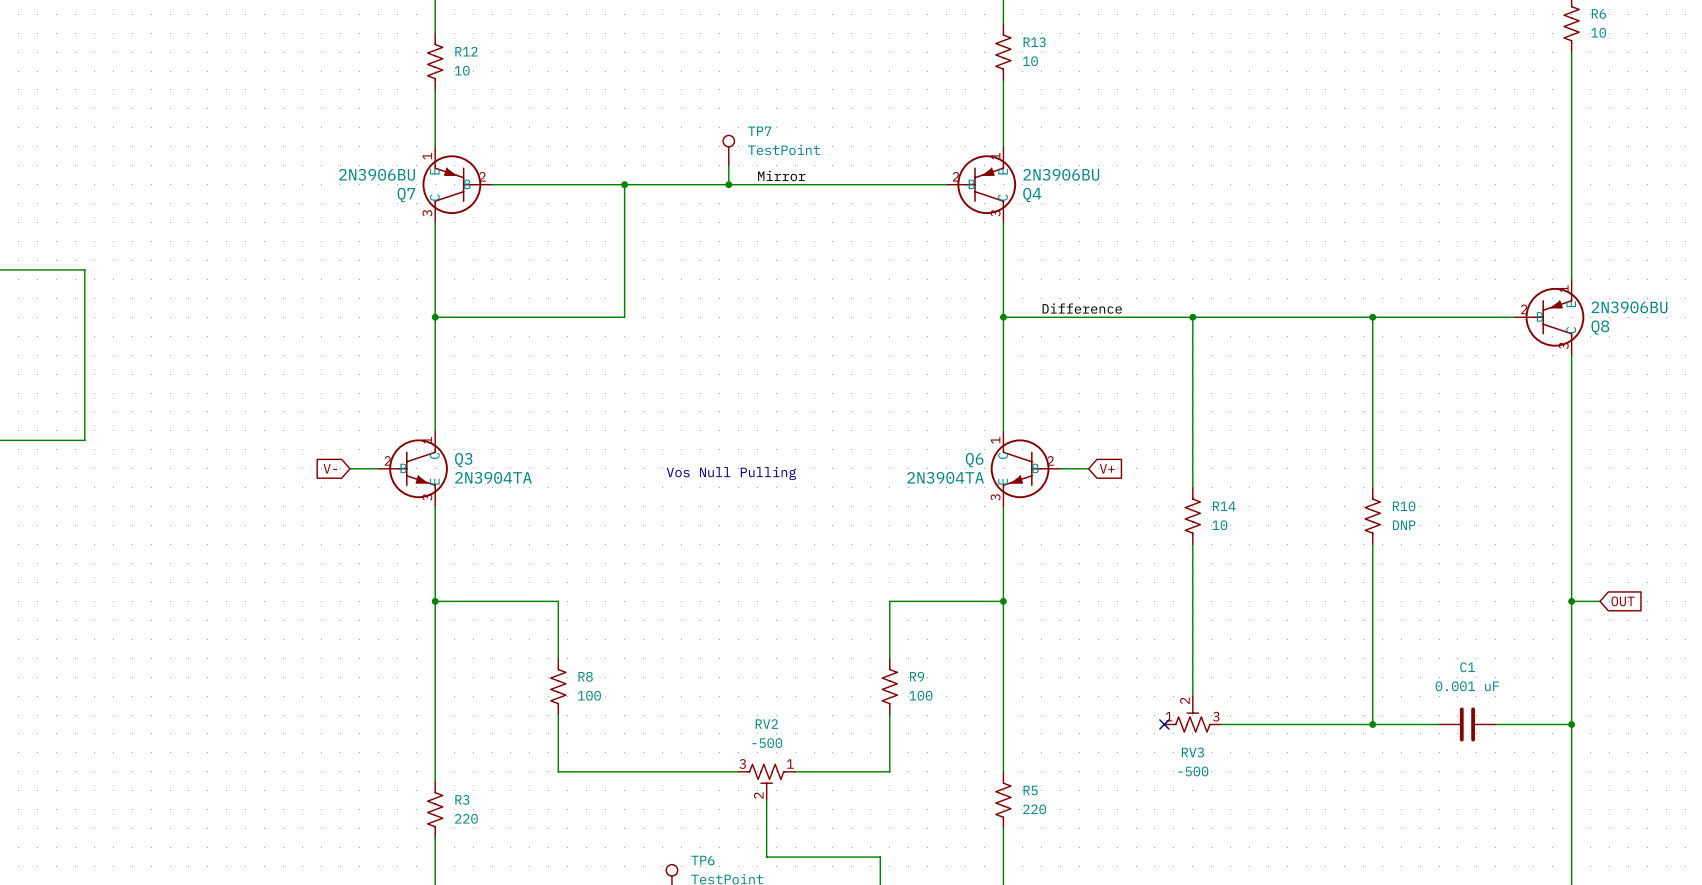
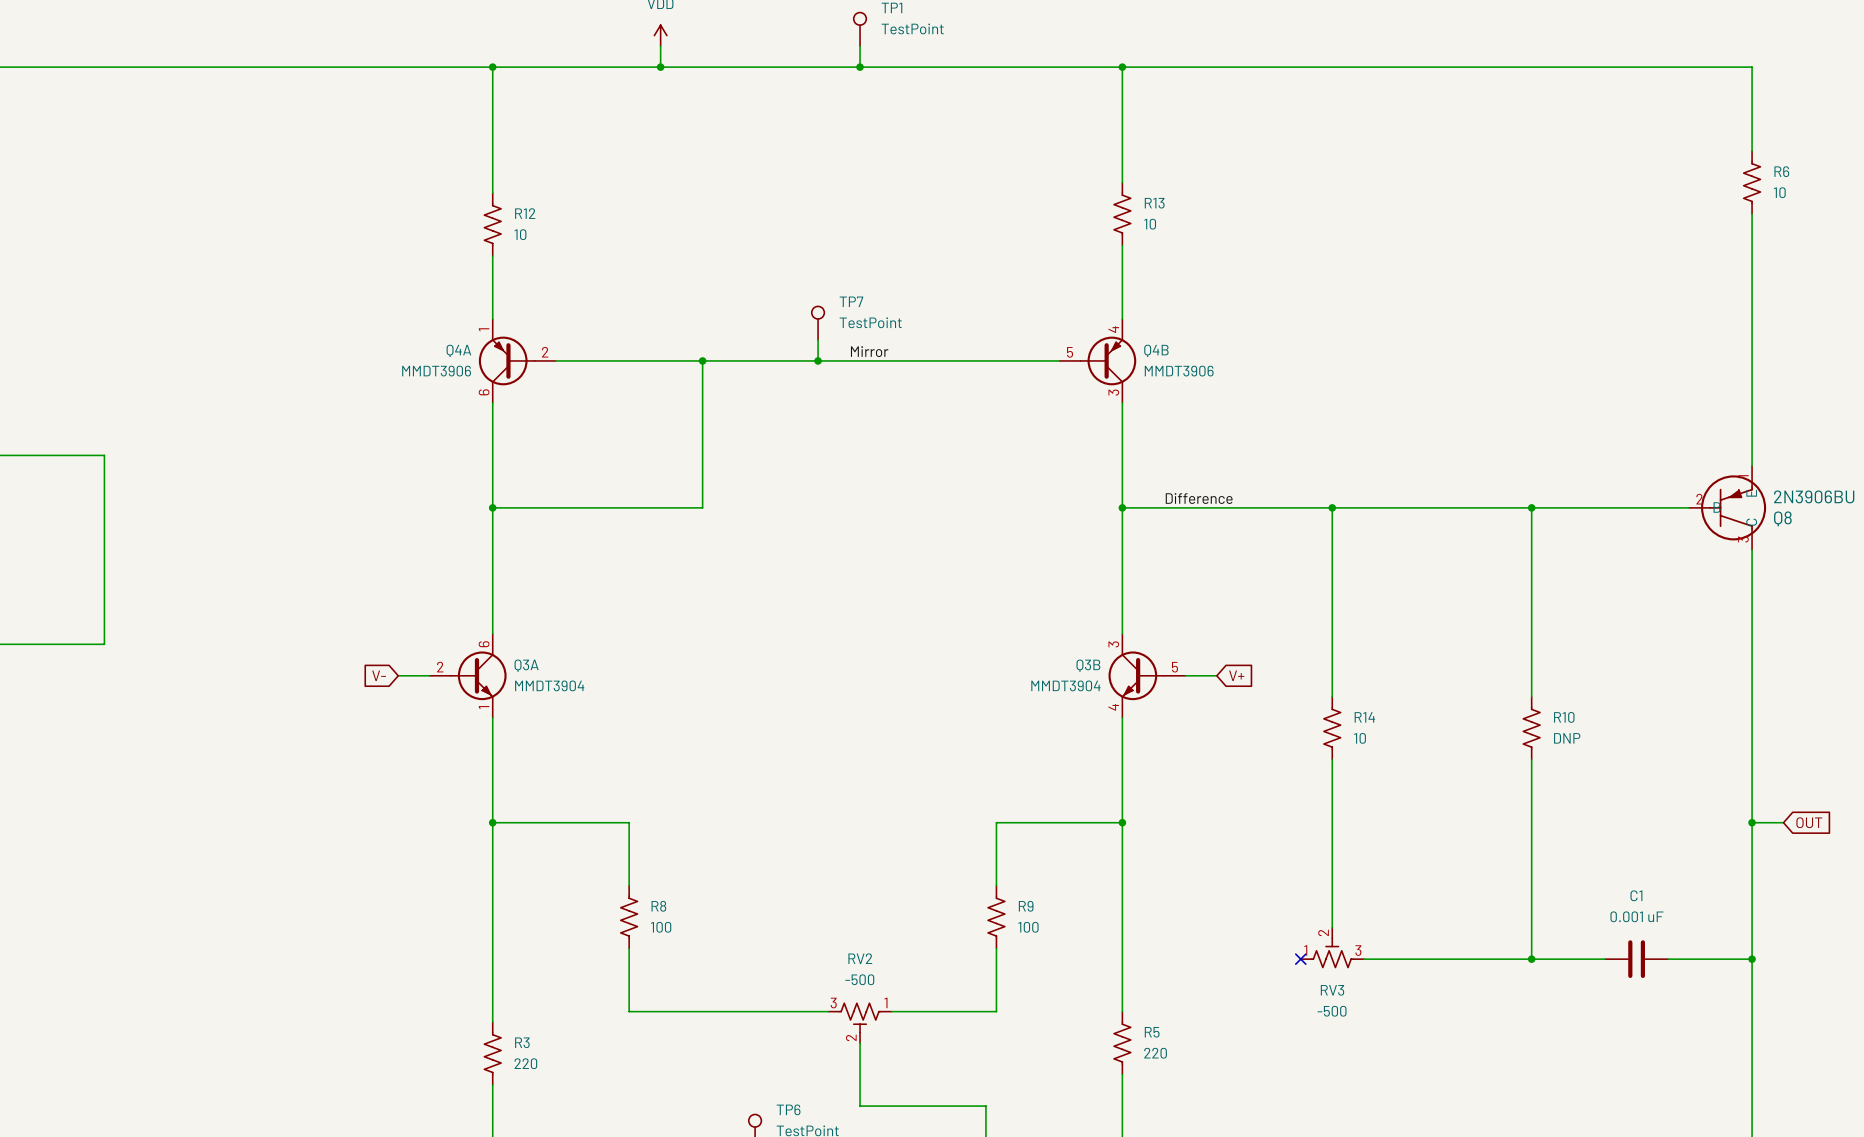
Q7: 2N3906BU (457, 184) -> none
Q4A: none -> MMDT3906 (517, 360)
Q4: 2N3906BU (981, 184) -> none
Q4B: none -> MMDT3906 (1097, 360)
Q3: 2N3904TA (413, 468) -> none
Q3A: none -> MMDT3904 (468, 675)
Q6: 2N3904TA (1025, 468) -> none
Q3B: none -> MMDT3904 (1146, 675)
text: Vos Null Pulling (731, 473) -> none

